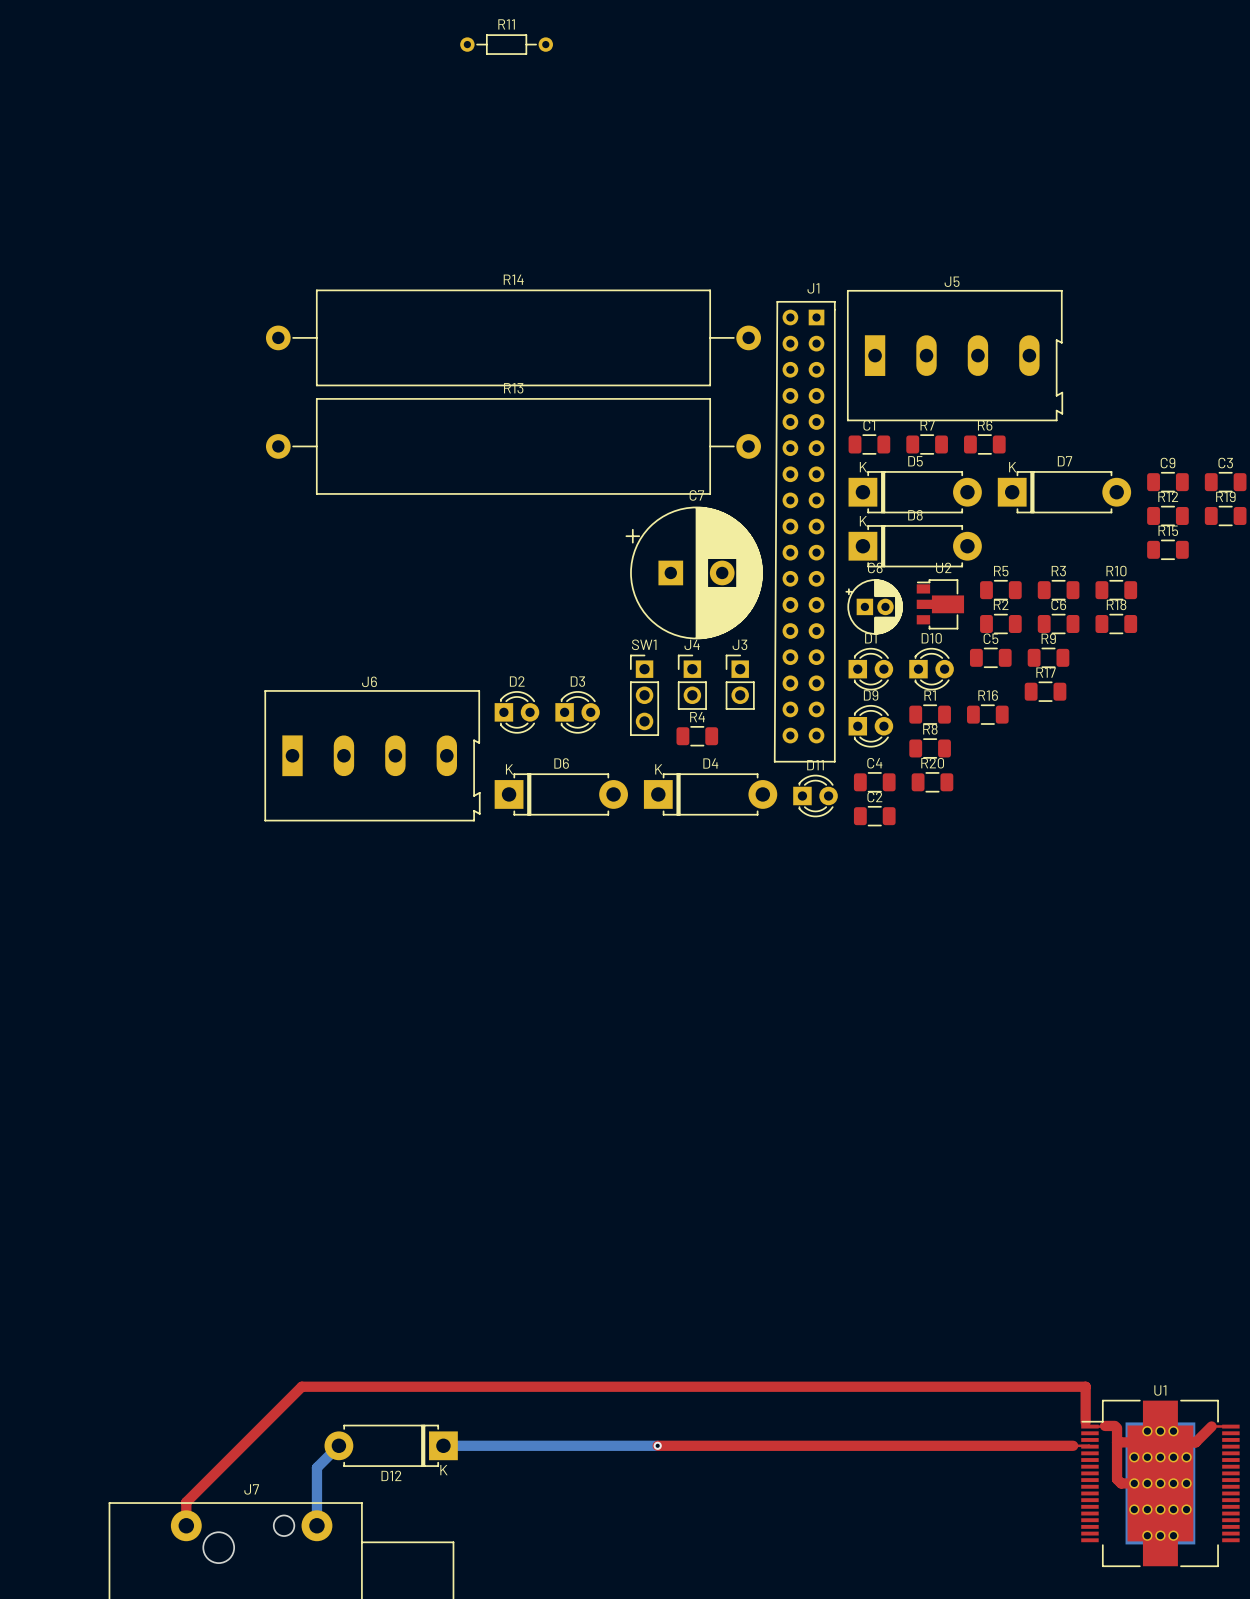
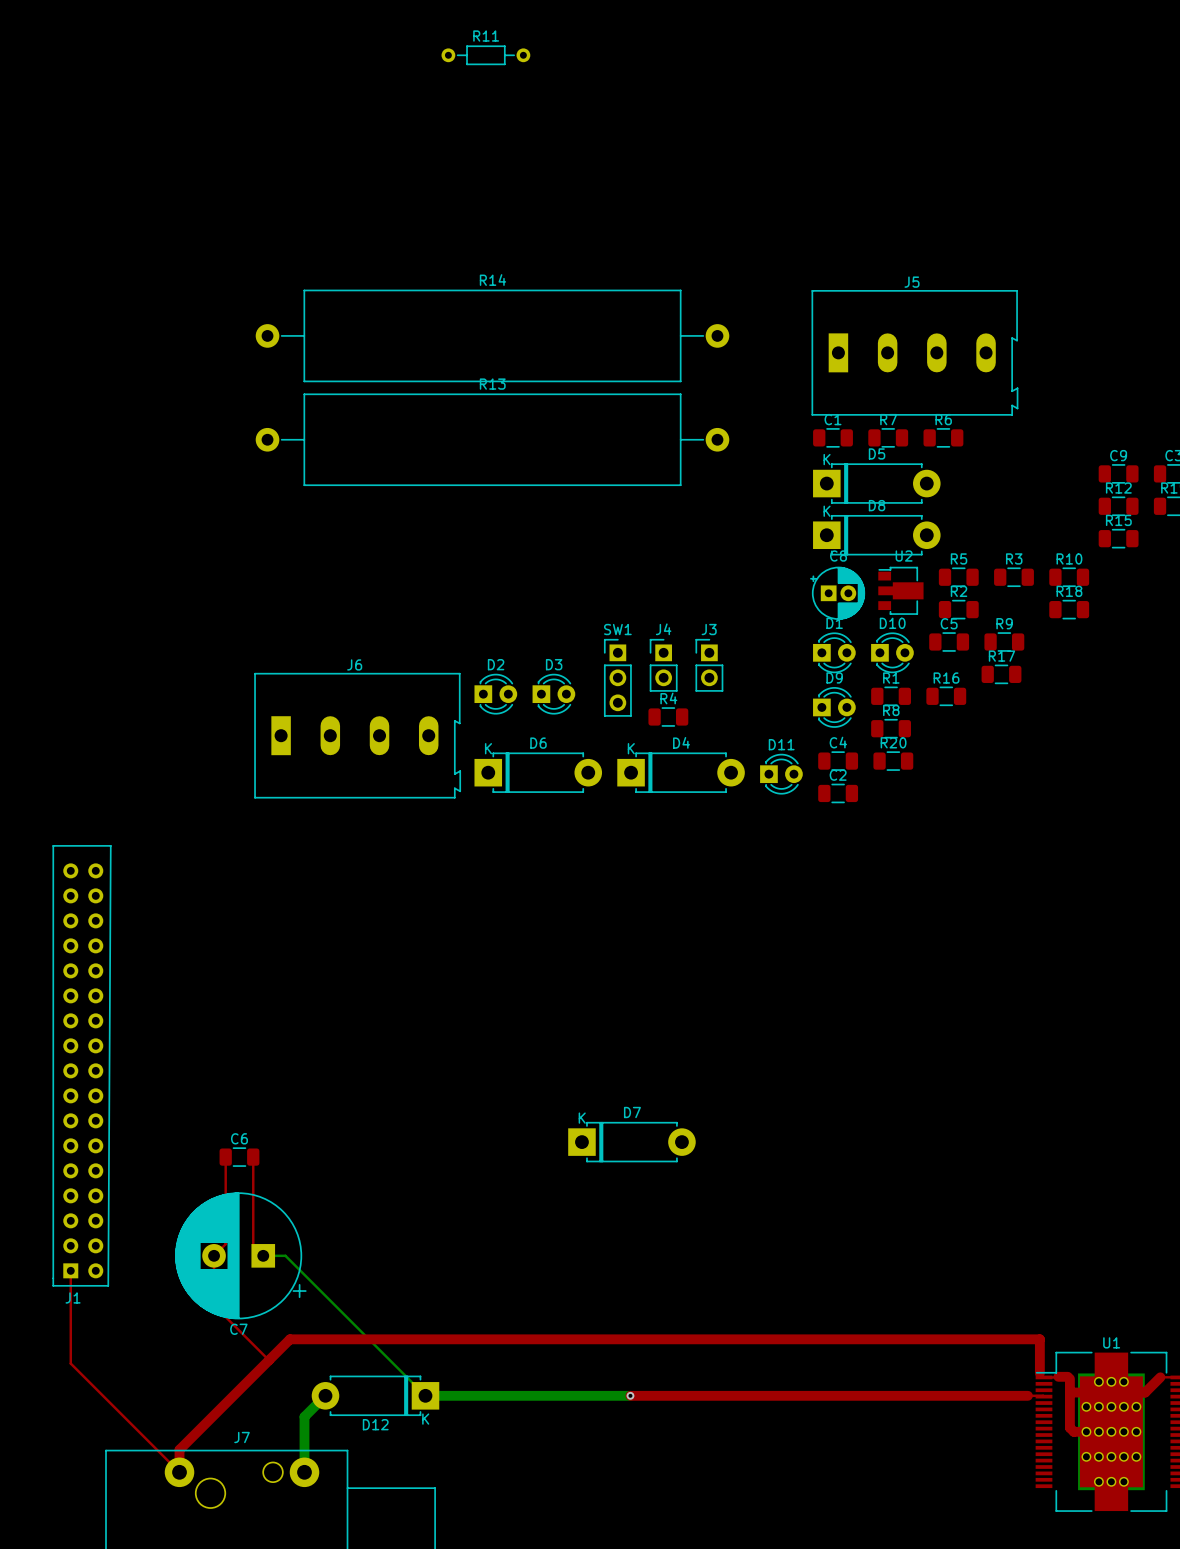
D7 position: (1064, 492) -> (631, 1142)
J1 rotation: 0° (804, 531) -> 180° (82, 1065)
J1 position: (804, 531) -> (82, 1065)
C7 rotation: 0° (694, 572) -> 180° (240, 1255)
C7 position: (694, 572) -> (240, 1255)
C6 position: (1058, 624) -> (239, 1157)
top track: none -> (225, 1157) (225, 1244) (214, 1255) (214, 1305) (269, 1360)
top track: none -> (253, 1157) (253, 1245) (263, 1255)
bottom track: none -> (263, 1255) (285, 1255) (425, 1395)
top track: none -> (70, 1270) (70, 1363) (179, 1472)

